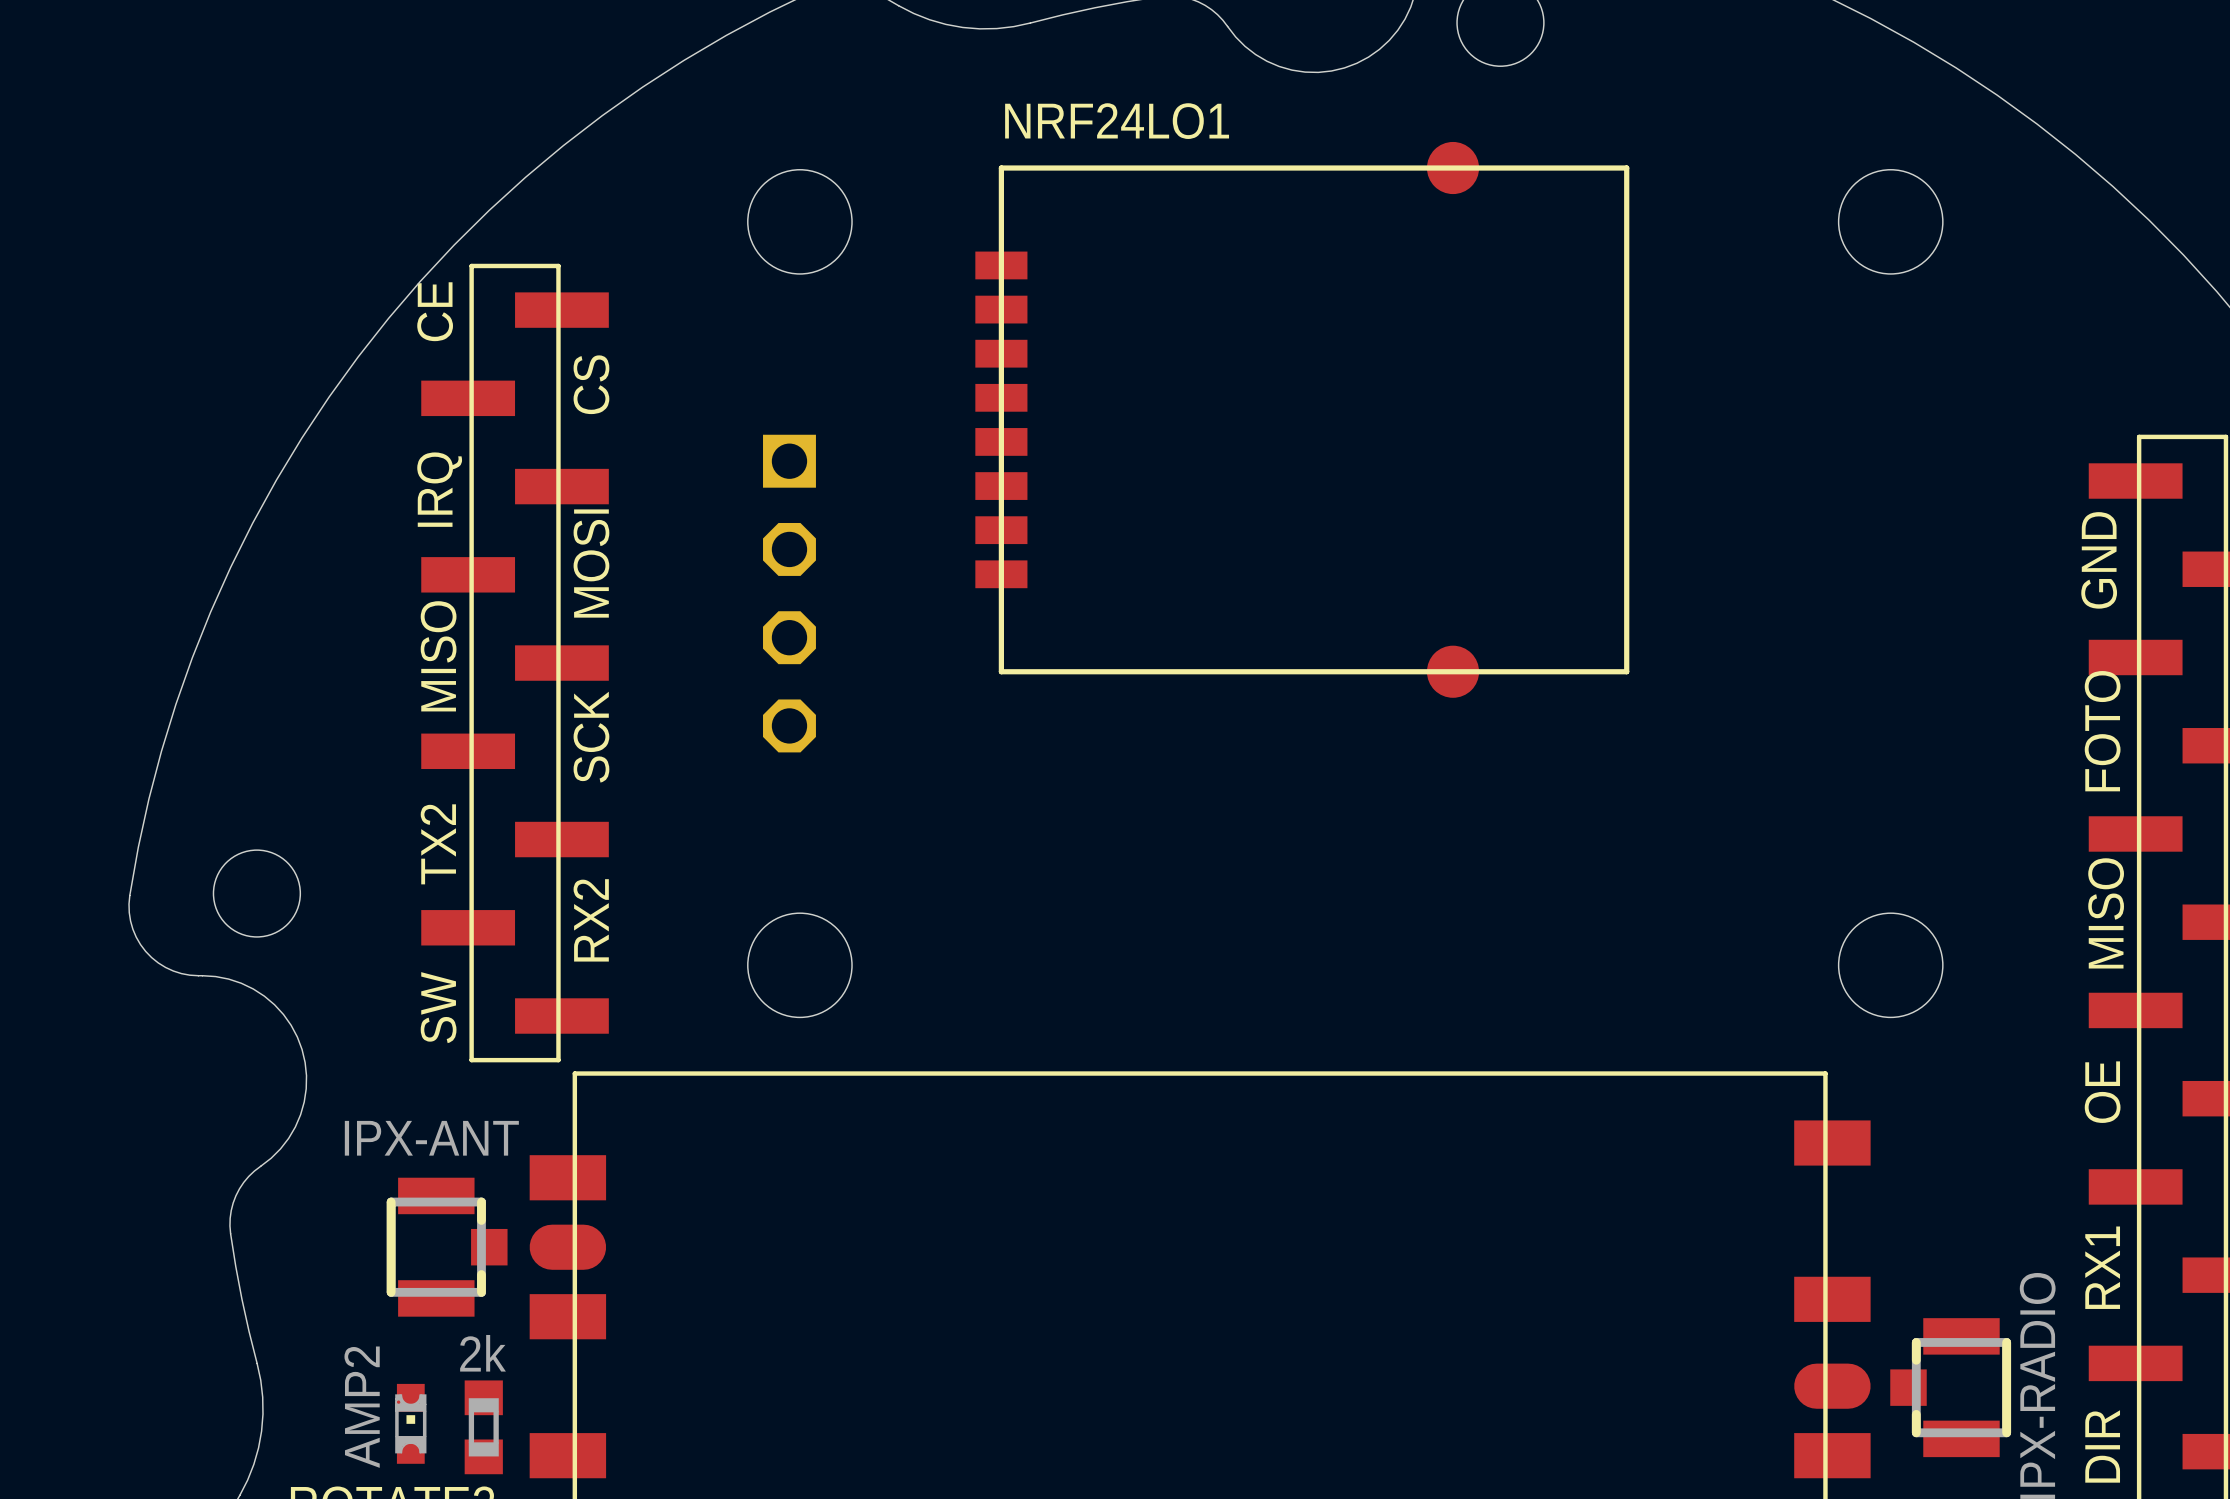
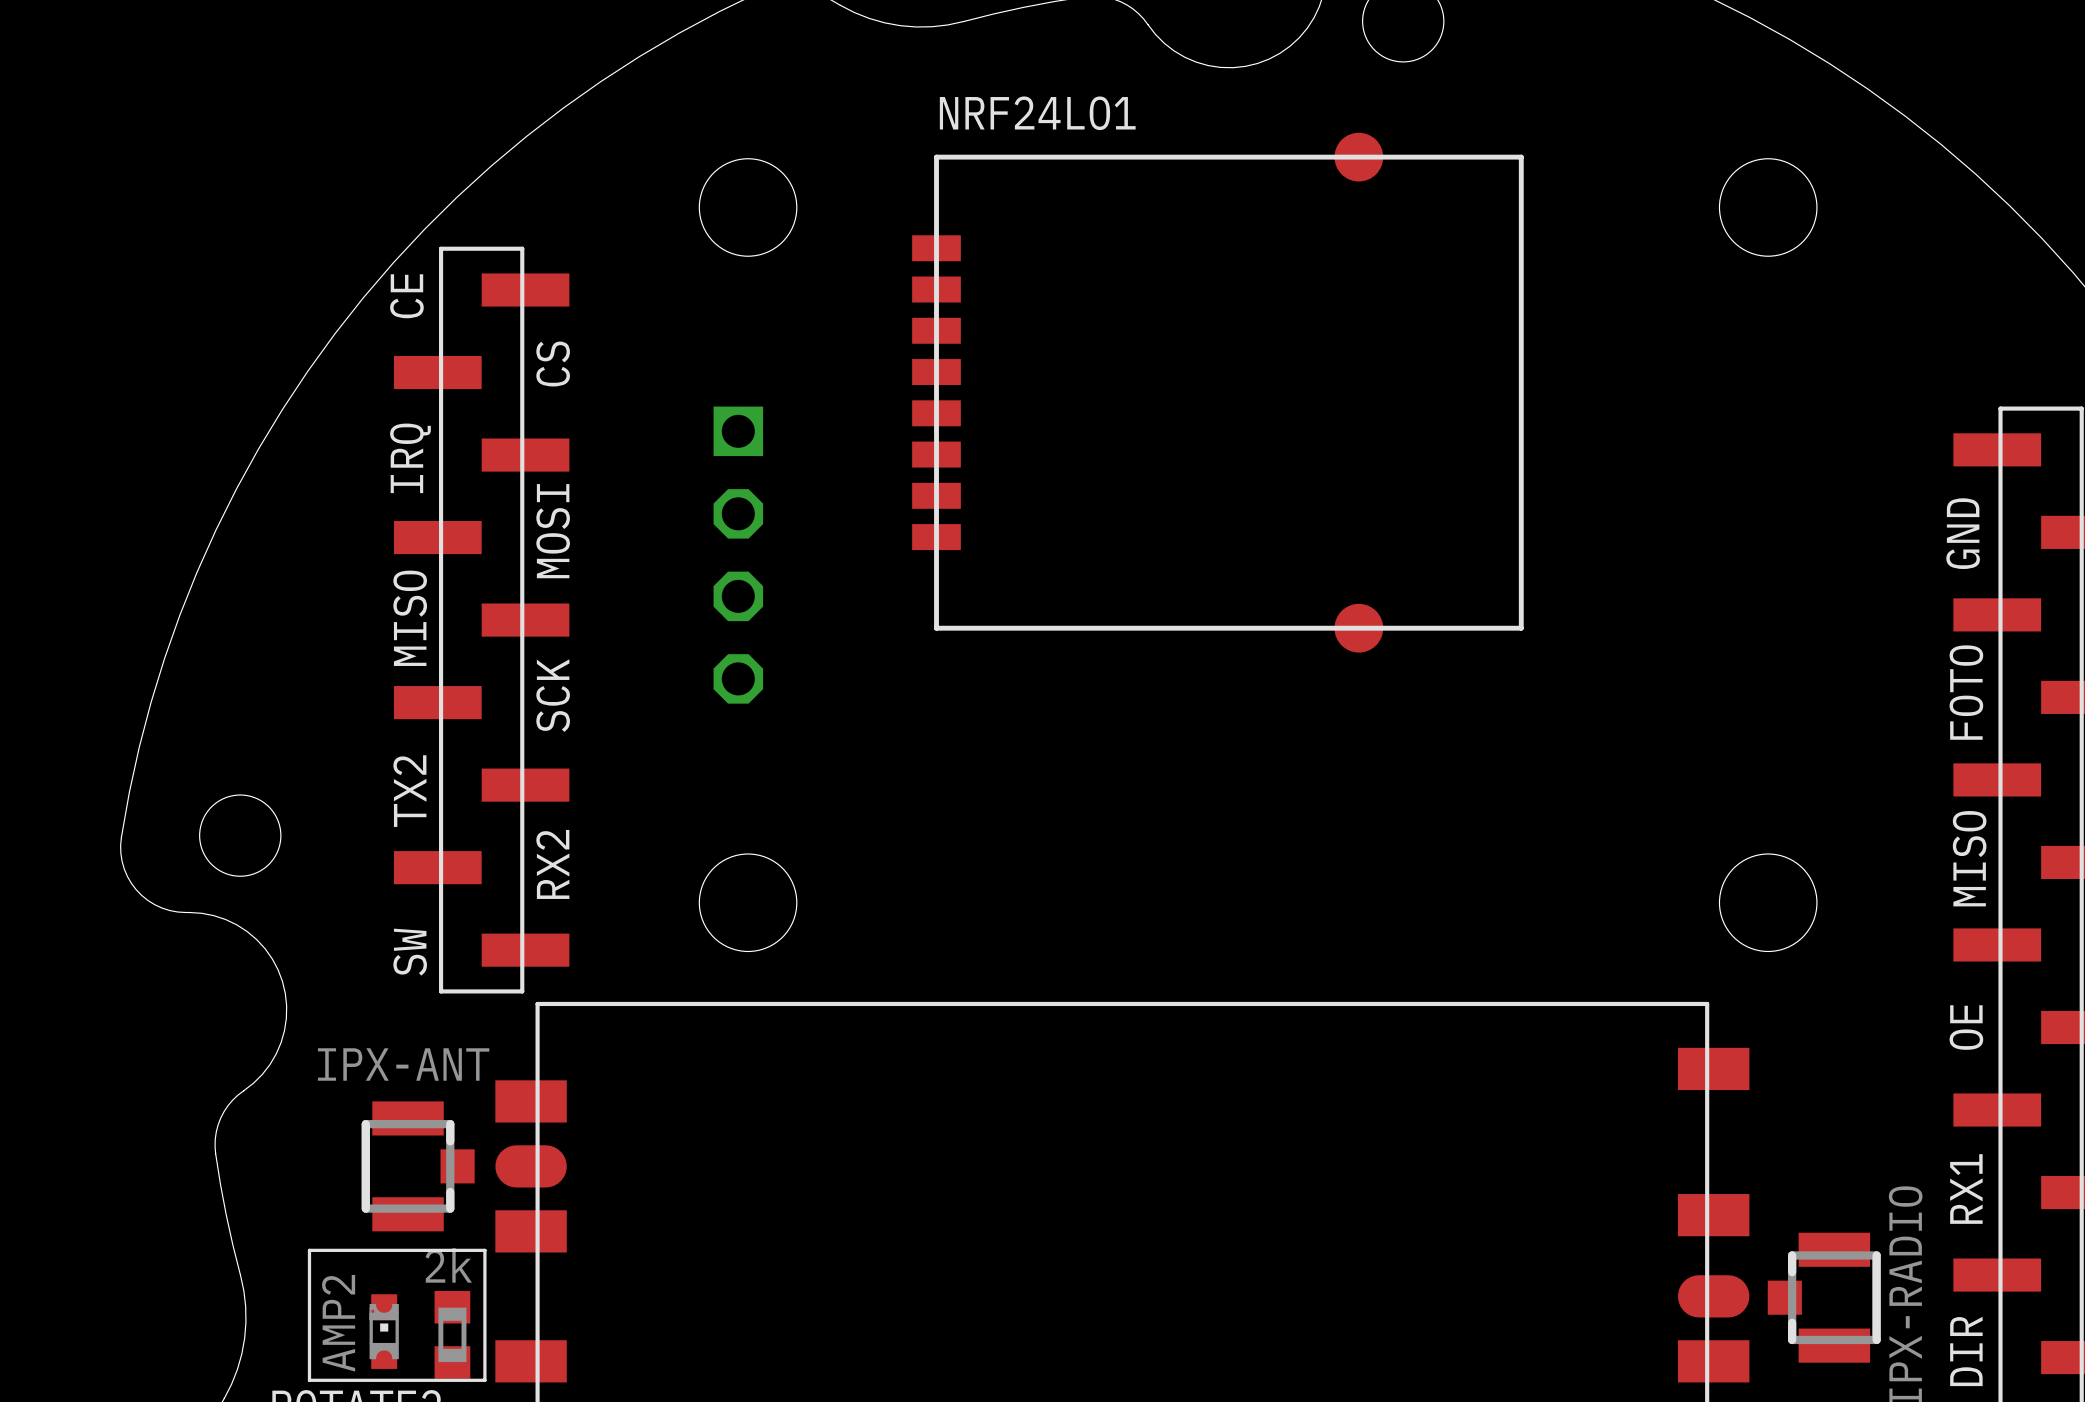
line: none -> (309, 1250) (309, 1380) (484, 1380) (484, 1250) (309, 1250)

